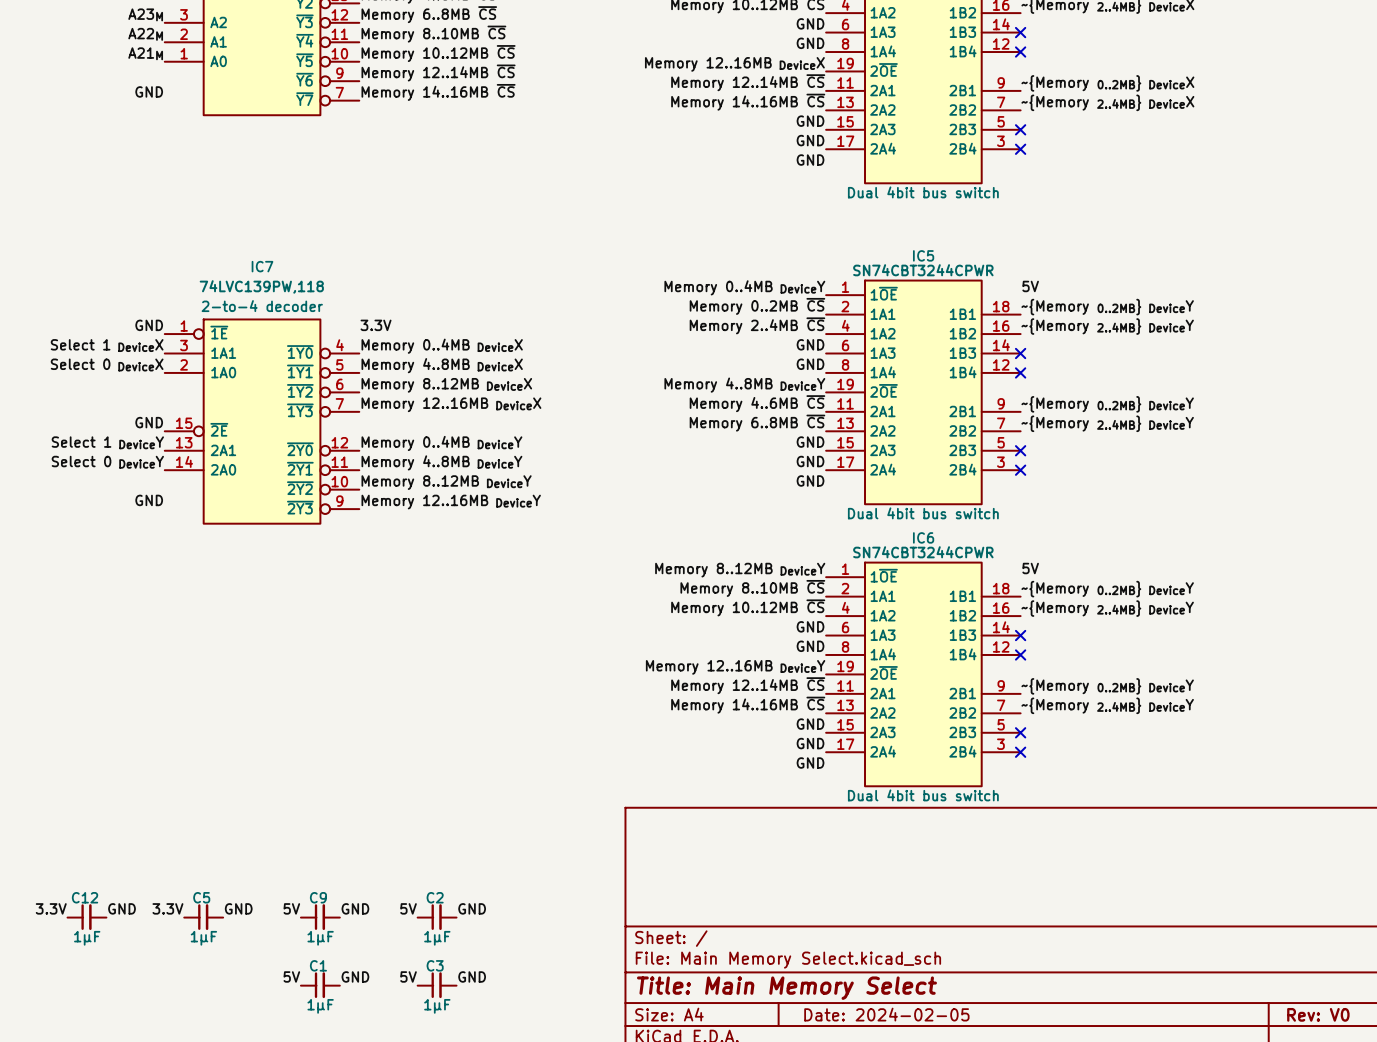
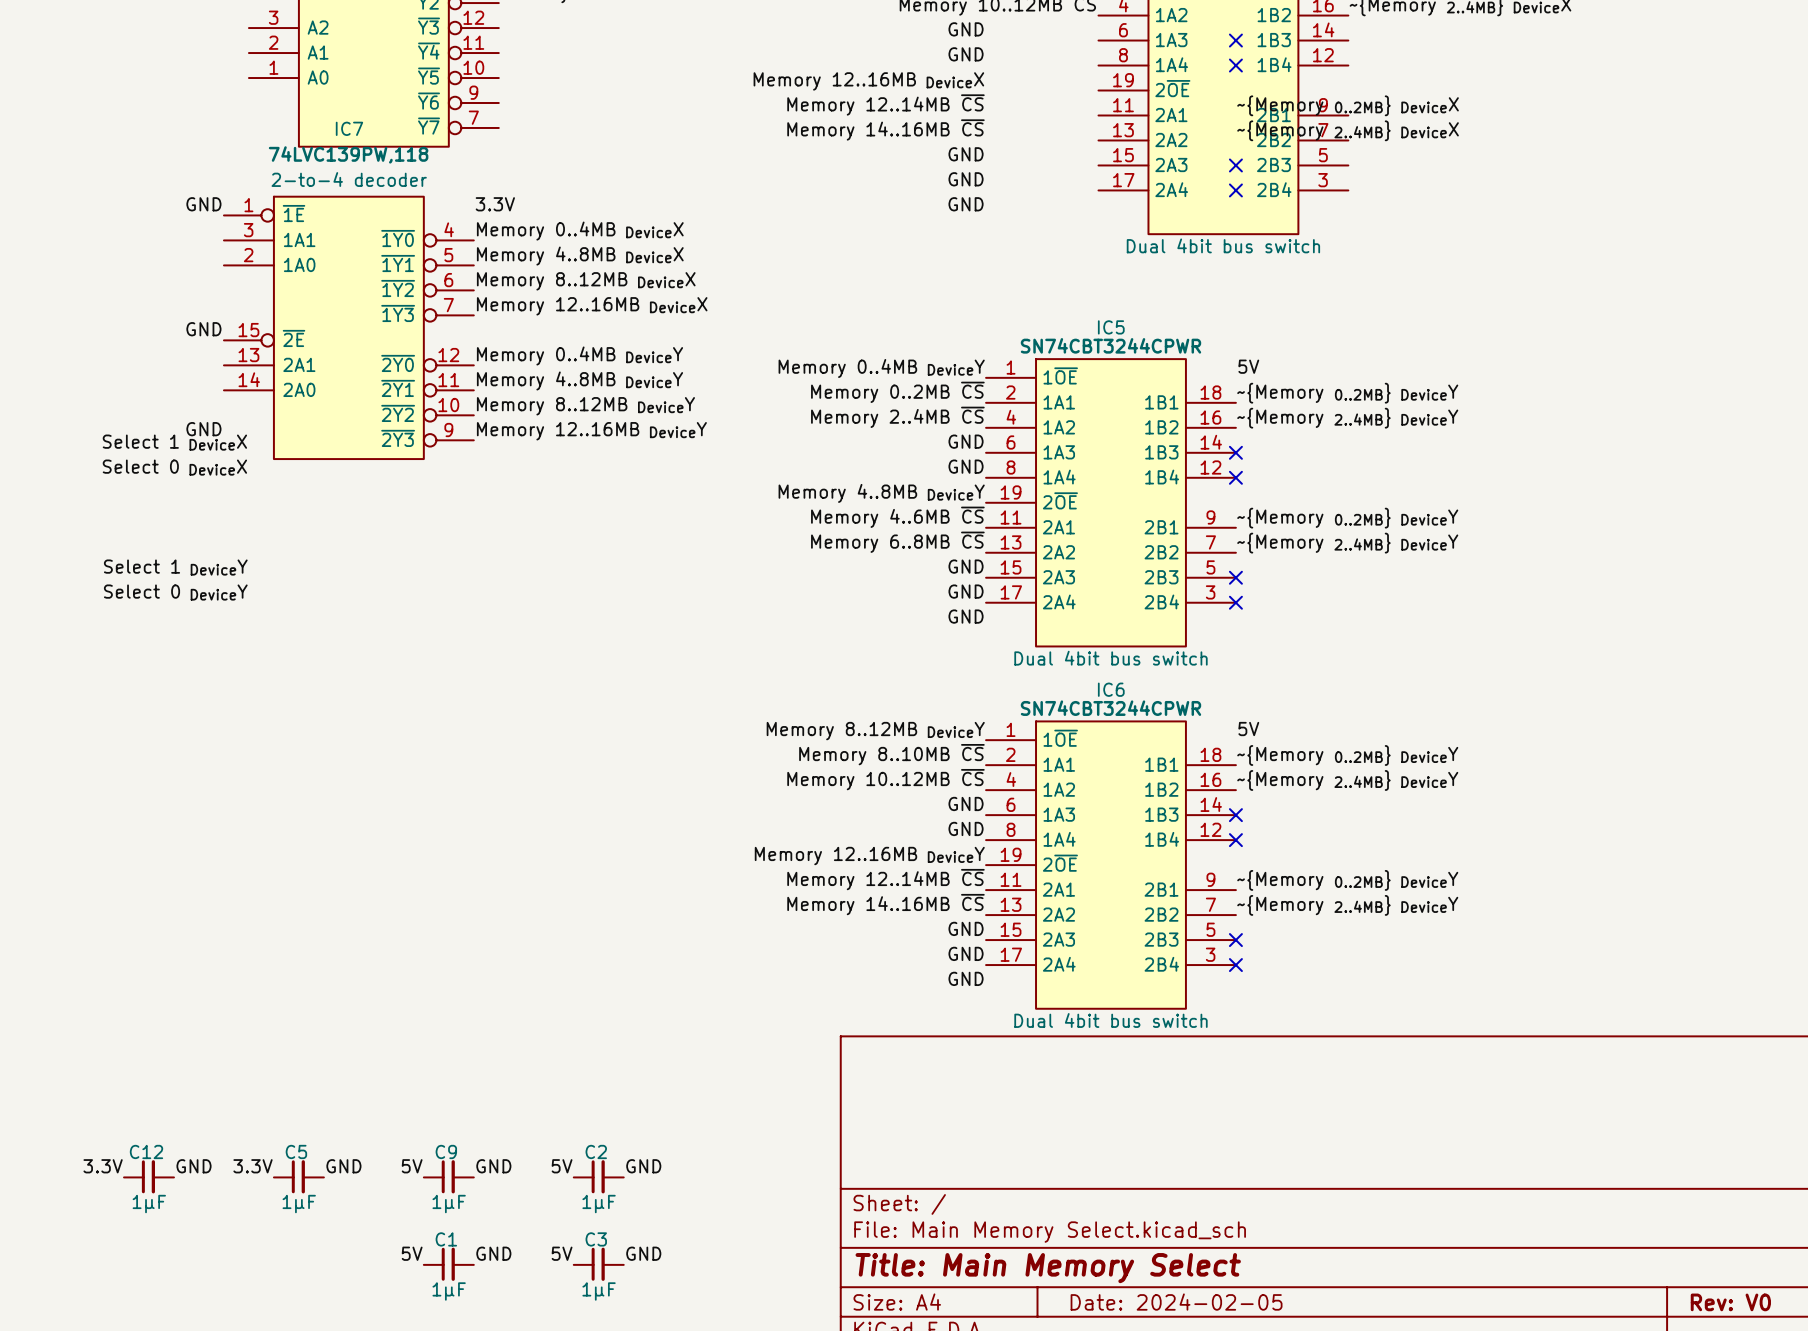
label: A23M (145, 14) -> none
label: Memory 6..8MB ~{CS} (429, 14) -> none
label: none -> GND (966, 29)
label: GND (810, 23) -> none
no-connect mark: none -> (1235, 40)
no-connect mark: (1020, 32) -> none
label: A22M (145, 34) -> none
label: Memory 8..10MB ~{CS} (433, 34) -> none
label: none -> GND (966, 54)
label: GND (810, 43) -> none
no-connect mark: none -> (1235, 65)
no-connect mark: (1020, 52) -> none
label: A21M (145, 53) -> none
label: Memory 10..12MB ~{CS} (438, 53) -> none
label position: Memory 12..16MB DeviceX (734, 64) -> Memory 12..16MB DeviceX (868, 81)
label: Memory 12..14MB ~{CS} (438, 73) -> none
label position: Memory 12..14MB ~{CS} (748, 82) -> Memory 12..14MB ~{CS} (885, 104)
label position: ~{Memory 0..2MB} DeviceX (1107, 83) -> ~{Memory 0..2MB} DeviceX (1348, 105)
label position: GND (149, 91) -> GND (203, 204)
label: Memory 14..16MB ~{CS} (438, 92) -> none
label position: Memory 14..16MB ~{CS} (748, 102) -> Memory 14..16MB ~{CS} (885, 129)
label position: ~{Memory 2..4MB} DeviceX (1107, 102) -> ~{Memory 2..4MB} DeviceX (1348, 130)
label: none -> GND (966, 154)
label: GND (810, 121) -> none
no-connect mark: none -> (1235, 165)
no-connect mark: (1020, 129) -> none
label: none -> GND (966, 179)
label: GND (810, 140) -> none
no-connect mark: none -> (1235, 190)
no-connect mark: (1020, 149) -> none
label: none -> 3.3V (495, 204)
label: none -> GND (966, 204)
label: GND (810, 160) -> none
label: none -> GND (203, 329)
label position: 5V (1030, 286) -> 5V (1248, 366)
label position: Memory 0..4MB DeviceY (744, 287) -> Memory 0..4MB DeviceY (881, 368)
label position: Memory 0..2MB ~{CS} (757, 306) -> Memory 0..2MB ~{CS} (897, 392)
label: none -> ~{Memory 0..2MB} DeviceY (1347, 393)
label: ~{Memory 0..2MB} DeviceY (1107, 307) -> none
label position: GND (149, 325) -> GND (203, 429)
label: 3.3V (376, 325) -> none
label position: Memory 2..4MB ~{CS} (757, 325) -> Memory 2..4MB ~{CS} (897, 417)
label: none -> ~{Memory 2..4MB} DeviceY (1347, 418)
label: ~{Memory 2..4MB} DeviceY (1107, 326) -> none
label: none -> GND (966, 441)
label: GND (810, 344) -> none
label position: Memory 0..4MB DeviceX (442, 346) -> Memory 0..4MB DeviceX (580, 231)
no-connect mark: none -> (1235, 452)
no-connect mark: (1020, 353) -> none
label: none -> GND (966, 466)
label: GND (810, 364) -> none
label position: Memory 4..8MB DeviceX (442, 365) -> Memory 4..8MB DeviceX (580, 256)
no-connect mark: none -> (1235, 477)
no-connect mark: (1020, 372) -> none
label position: Memory 8..12MB DeviceX (446, 385) -> Memory 8..12MB DeviceX (586, 281)
label position: Memory 4..8MB DeviceY (744, 385) -> Memory 4..8MB DeviceY (881, 493)
IC5 position: (923, 392) -> (1110, 502)
label position: Memory 4..6MB ~{CS} (757, 403) -> Memory 4..6MB ~{CS} (897, 517)
label position: Memory 12..16MB DeviceX (451, 404) -> Memory 12..16MB DeviceX (592, 306)
label: none -> ~{Memory 0..2MB} DeviceY (1347, 518)
label: ~{Memory 0..2MB} DeviceY (1107, 404) -> none
IC7 position: (262, 421) -> (348, 327)
label: GND (149, 422) -> none
label position: Memory 6..8MB ~{CS} (757, 423) -> Memory 6..8MB ~{CS} (897, 542)
label: none -> ~{Memory 2..4MB} DeviceY (1347, 543)
label: ~{Memory 2..4MB} DeviceY (1107, 423) -> none
label: none -> GND (966, 566)
label: GND (810, 442) -> none
label position: Memory 0..4MB DeviceY (441, 443) -> Memory 0..4MB DeviceY (579, 355)
no-connect mark: none -> (1235, 577)
no-connect mark: (1020, 450) -> none
label: none -> GND (966, 591)
label: GND (810, 461) -> none
label position: Memory 4..8MB DeviceY (441, 462) -> Memory 4..8MB DeviceY (579, 380)
no-connect mark: none -> (1235, 602)
no-connect mark: (1020, 470) -> none
label: none -> GND (966, 616)
label: GND (810, 480) -> none
label position: Memory 8..12MB DeviceY (446, 482) -> Memory 8..12MB DeviceY (585, 406)
label: GND (149, 500) -> none
label position: Memory 12..16MB DeviceY (451, 502) -> Memory 12..16MB DeviceY (591, 431)
label position: 5V (1030, 568) -> 5V (1248, 729)
label position: Memory 8..12MB DeviceY (740, 570) -> Memory 8..12MB DeviceY (875, 731)
label position: Memory 8..10MB ~{CS} (752, 588) -> Memory 8..10MB ~{CS} (891, 754)
label: none -> ~{Memory 0..2MB} DeviceY (1347, 755)
label: ~{Memory 0..2MB} DeviceY (1107, 589) -> none
label position: Memory 10..12MB ~{CS} (748, 607) -> Memory 10..12MB ~{CS} (885, 779)
label: none -> ~{Memory 2..4MB} DeviceY (1347, 780)
label: ~{Memory 2..4MB} DeviceY (1107, 608) -> none
label: none -> GND (966, 803)
label: GND (810, 626) -> none
no-connect mark: none -> (1235, 815)
no-connect mark: (1020, 635) -> none
label: none -> GND (966, 828)
label: GND (810, 646) -> none
no-connect mark: none -> (1235, 840)
no-connect mark: (1020, 654) -> none
label position: Memory 12..16MB DeviceY (735, 667) -> Memory 12..16MB DeviceY (869, 856)
IC6 position: (923, 674) -> (1110, 865)
label position: Memory 12..14MB ~{CS} (748, 685) -> Memory 12..14MB ~{CS} (885, 879)
label: none -> ~{Memory 0..2MB} DeviceY (1347, 880)
label: ~{Memory 0..2MB} DeviceY (1107, 686) -> none
label position: Memory 14..16MB ~{CS} (748, 705) -> Memory 14..16MB ~{CS} (885, 904)
label: none -> ~{Memory 2..4MB} DeviceY (1347, 905)
label: ~{Memory 2..4MB} DeviceY (1107, 705) -> none
label: none -> GND (966, 928)
label: GND (810, 724) -> none
no-connect mark: none -> (1235, 940)
no-connect mark: (1020, 732) -> none
label: none -> GND (966, 953)
label: GND (810, 743) -> none
no-connect mark: none -> (1235, 965)
no-connect mark: (1020, 752) -> none
label: none -> GND (966, 978)
label: GND (810, 763) -> none

